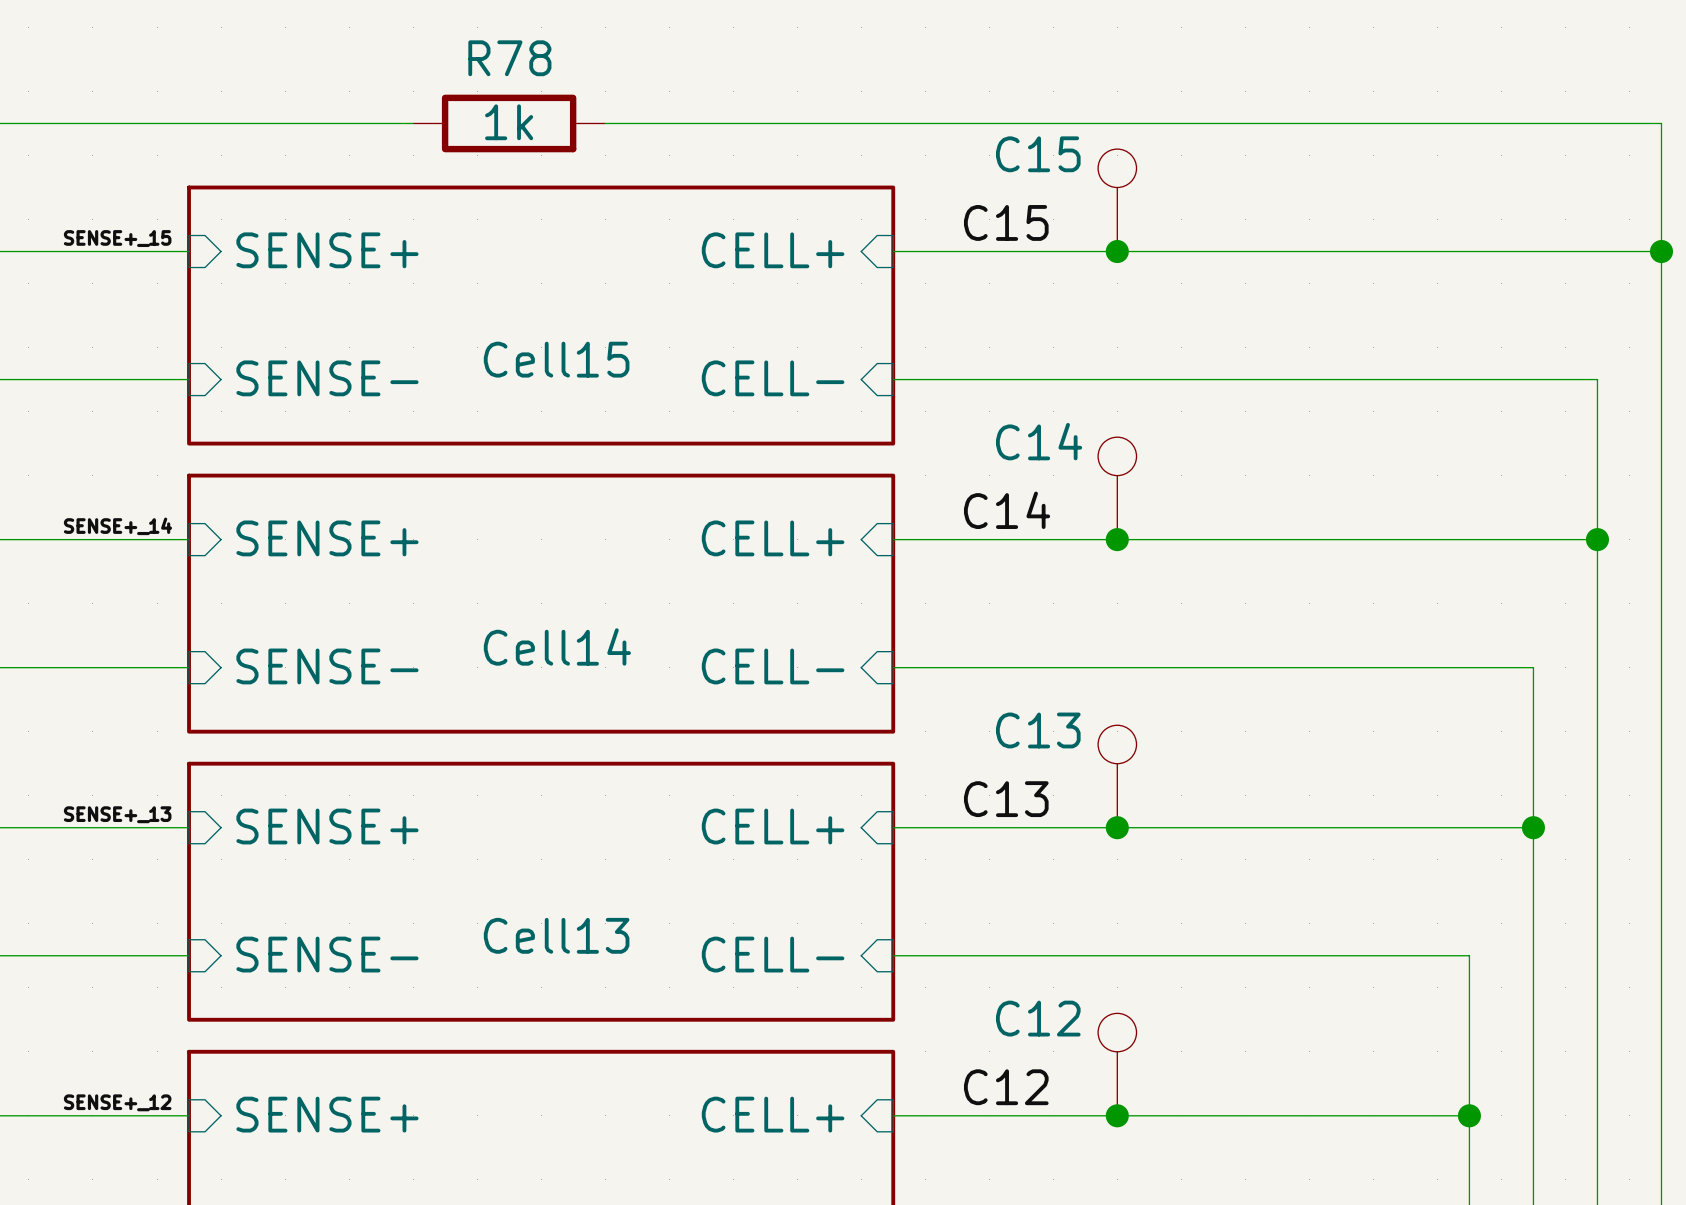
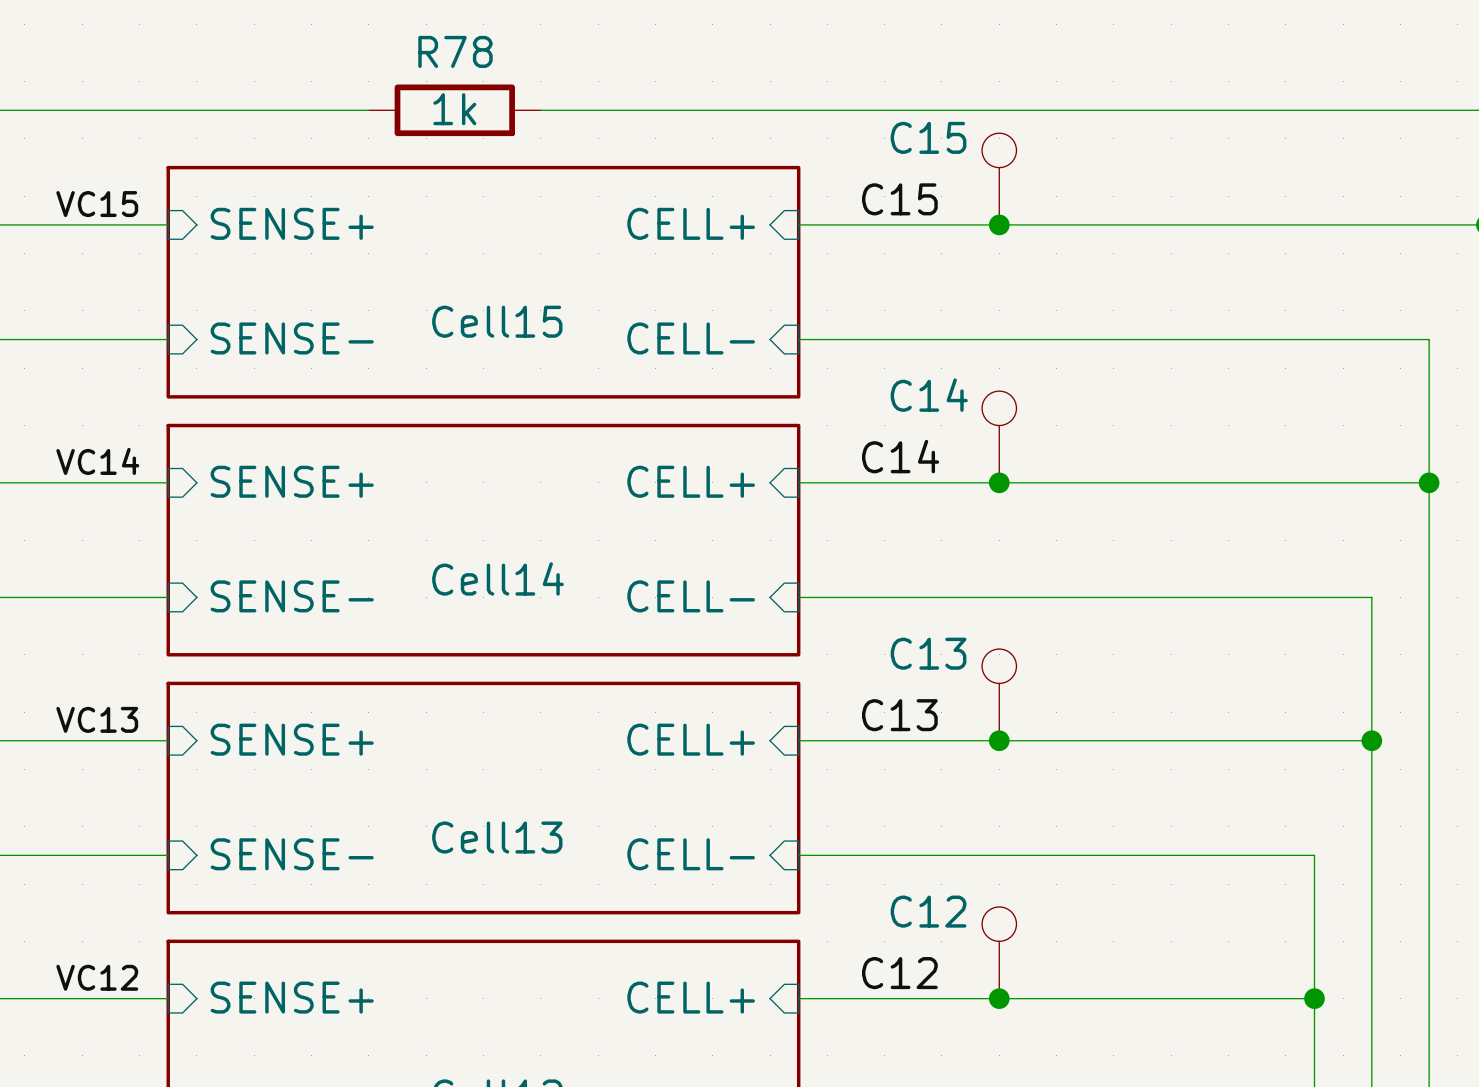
label: SENSE+_15 (117, 238) -> VC15 (97, 204)
label: SENSE+_14 (117, 526) -> VC14 (97, 461)
label: SENSE+_13 (117, 814) -> VC13 (97, 719)
label: SENSE+_12 (117, 1102) -> VC12 (97, 977)

